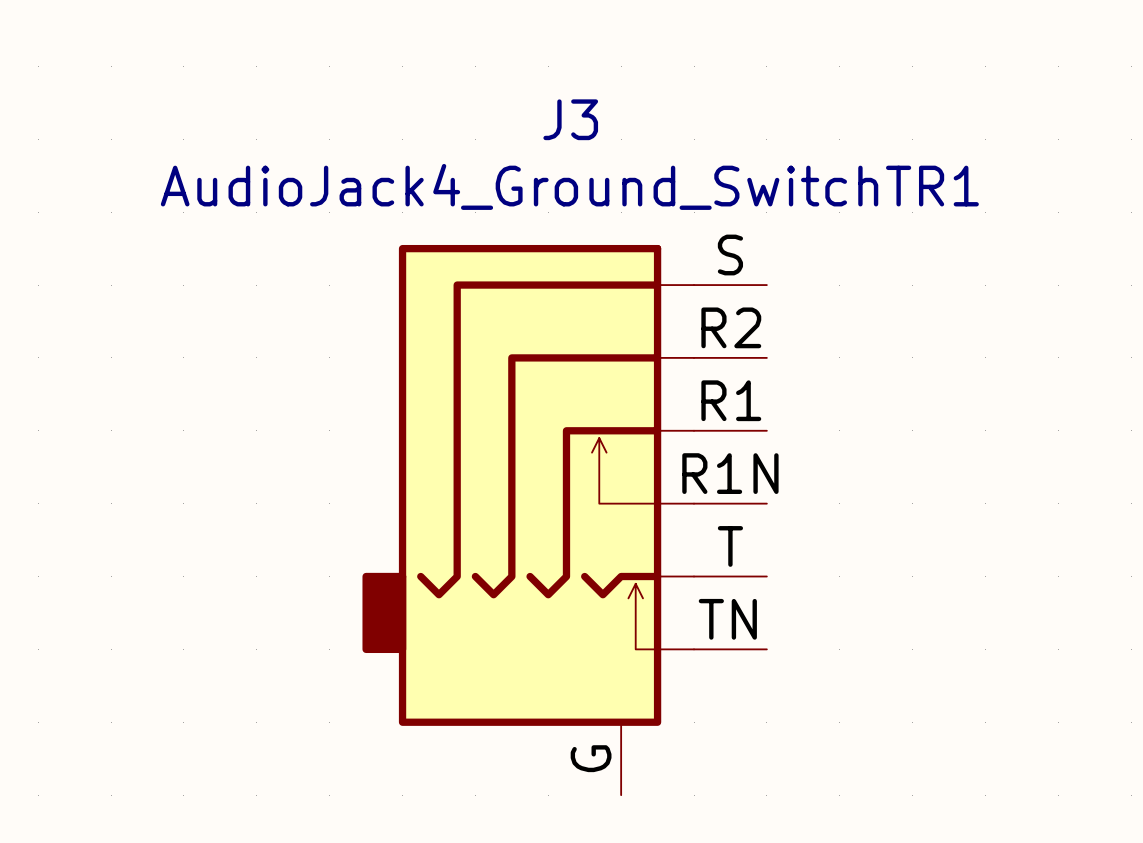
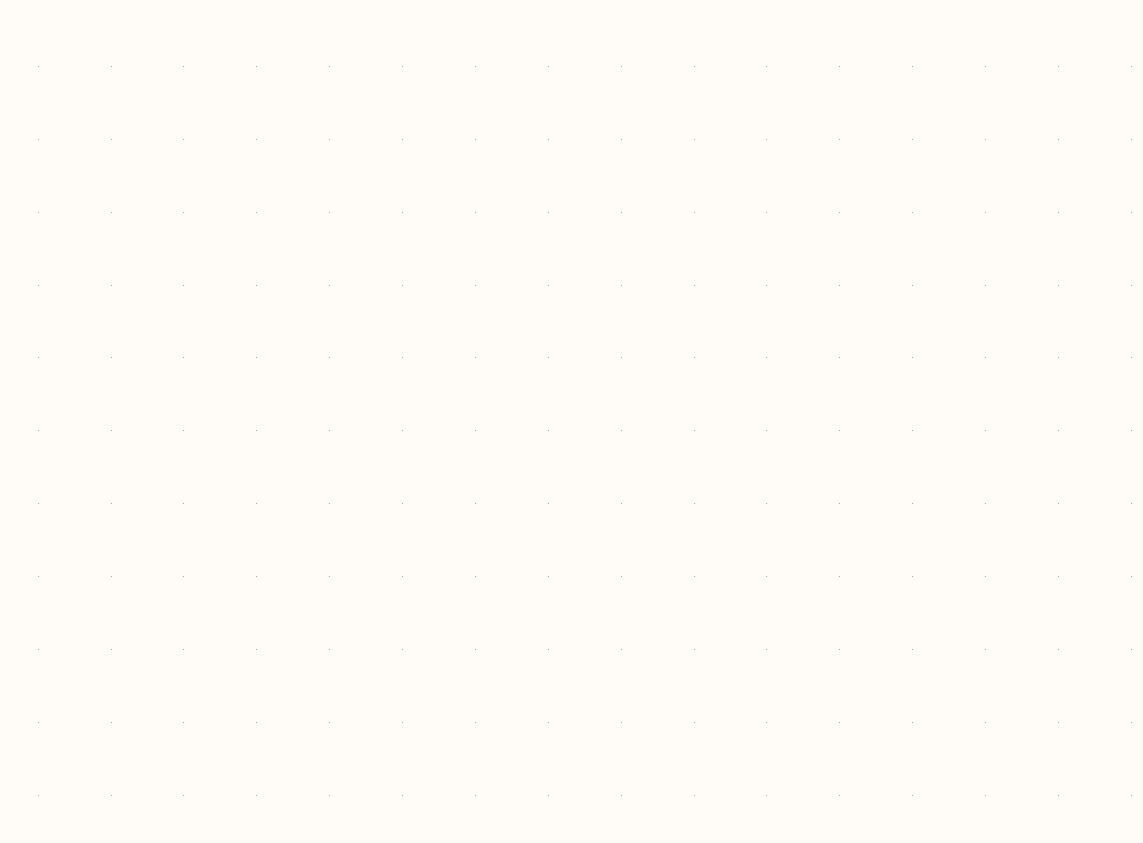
J3: AudioJack4_Ground_SwitchTR1 (564, 520) -> none

